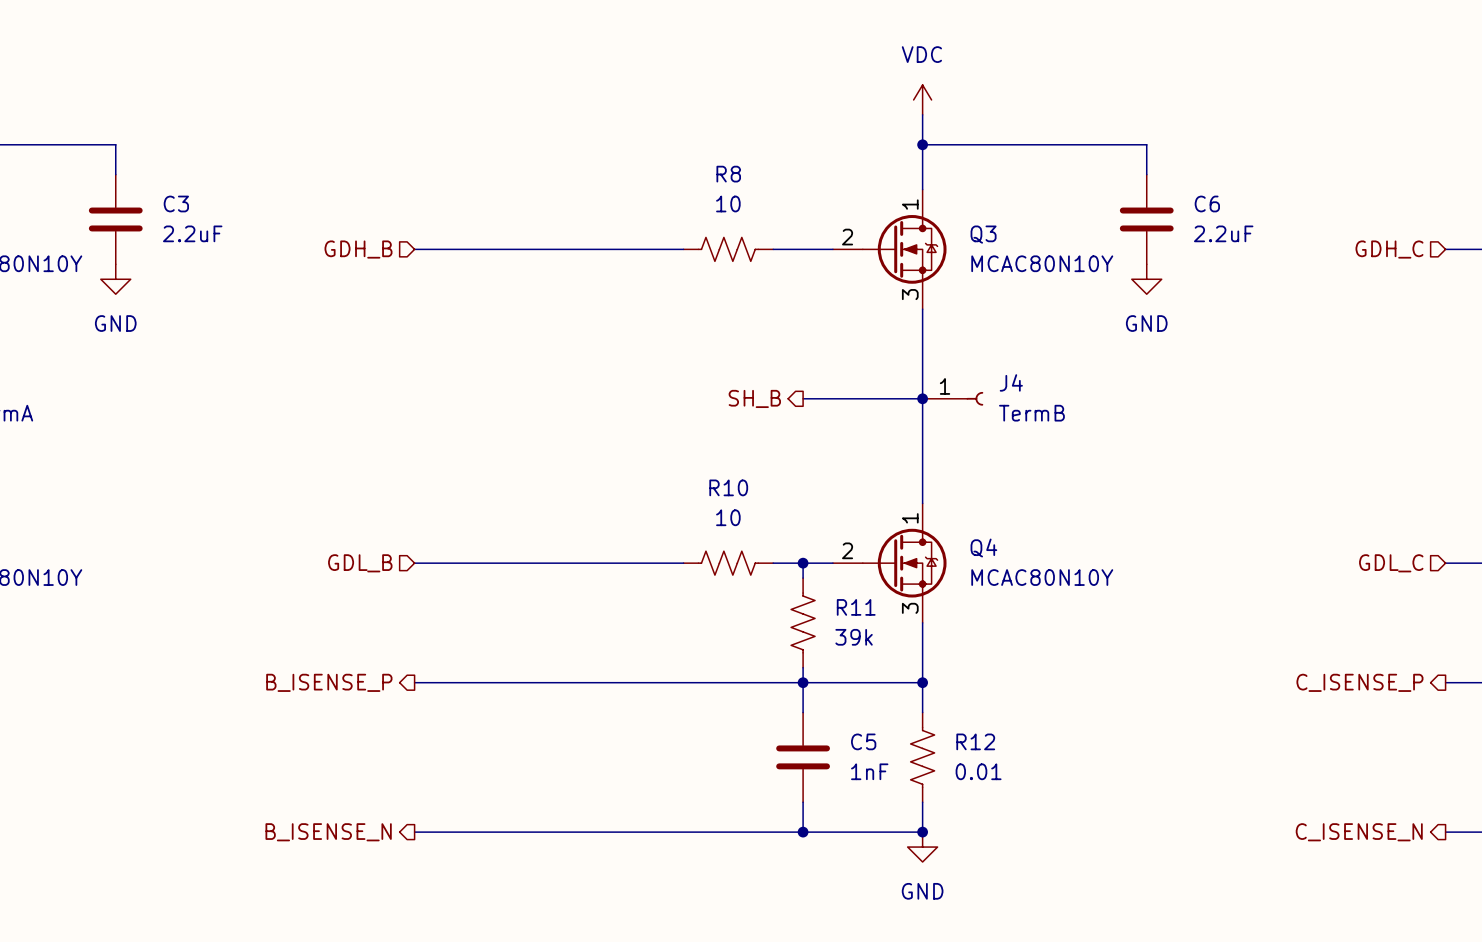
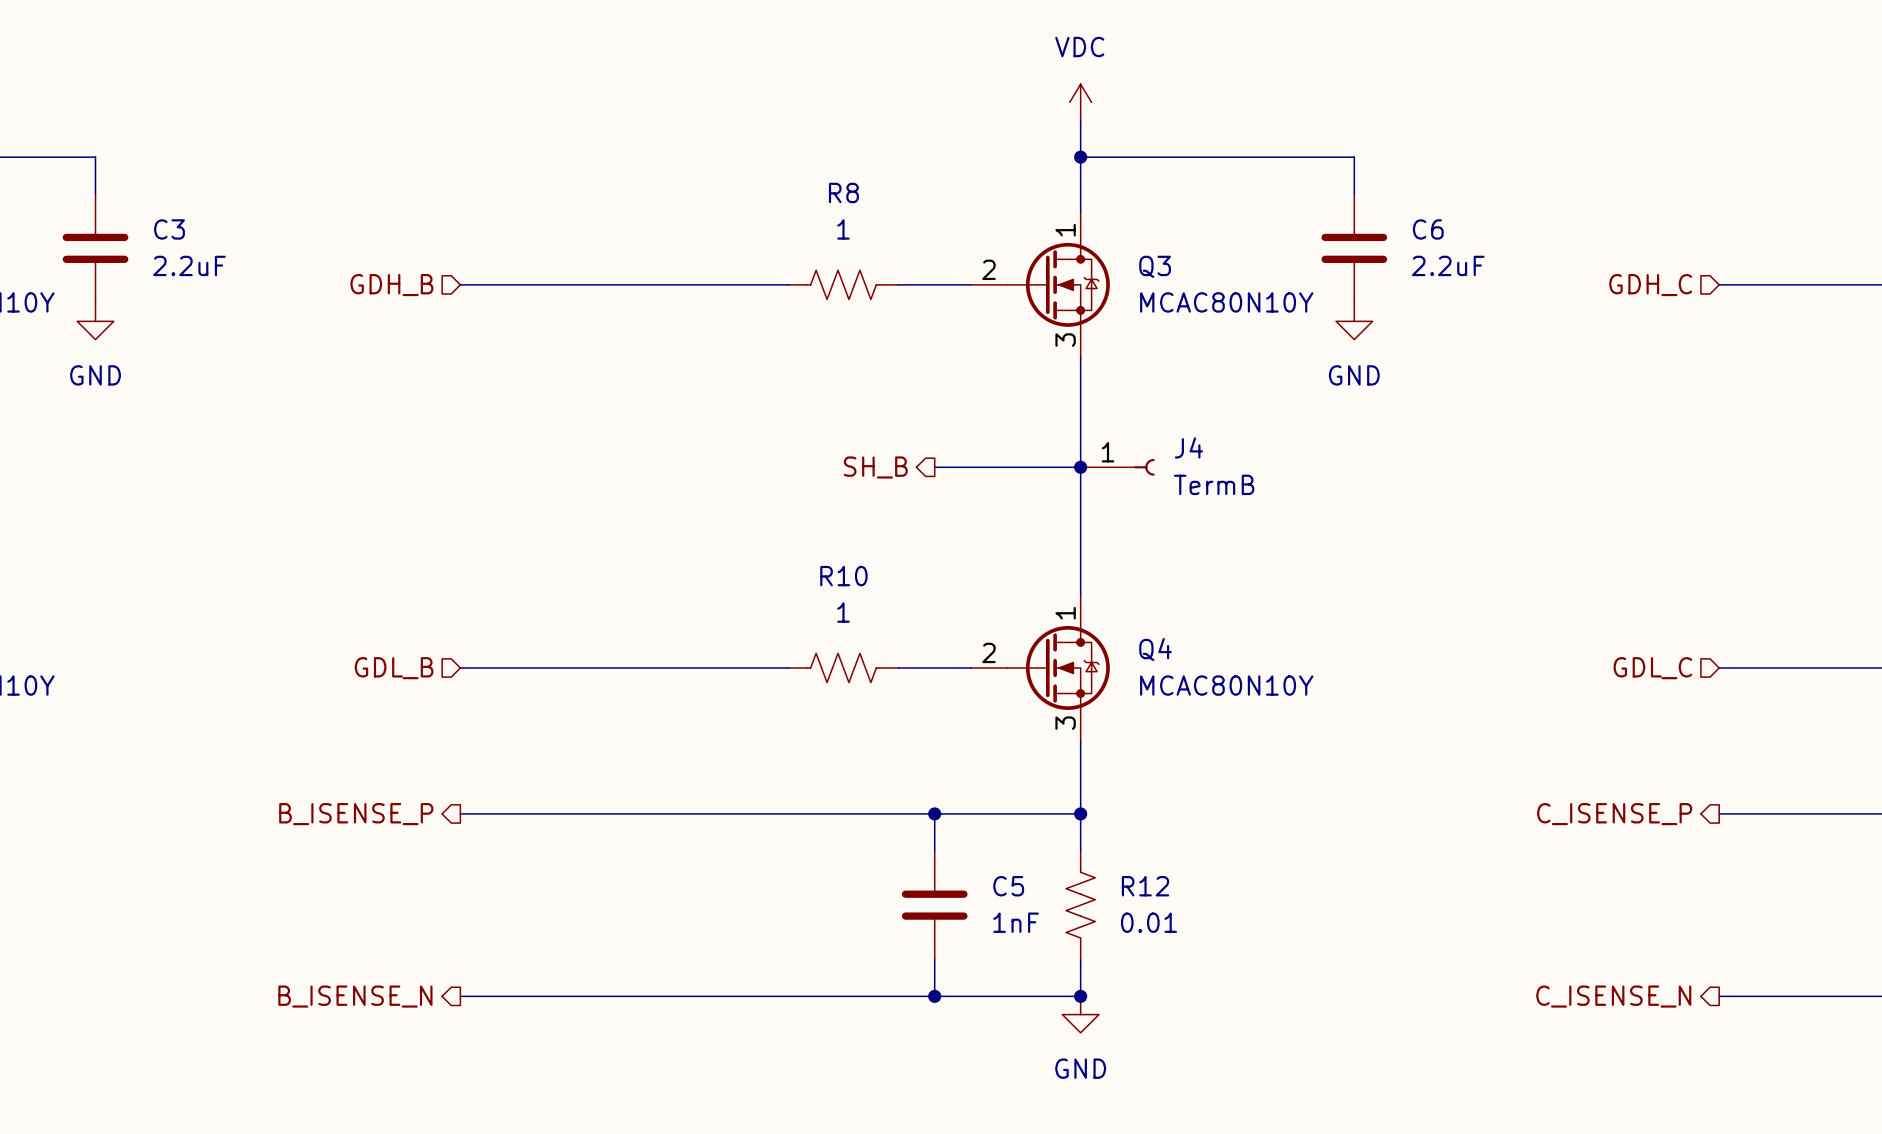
R8 value: 10 (728, 203) -> 1 (843, 229)
R10 value: 10 (728, 517) -> 1 (843, 612)
wire: (803, 563) (803, 578) -> none
junction: (803, 563) -> none
R11: 39k (803, 622) -> none
wire: (803, 667) (803, 682) -> none

